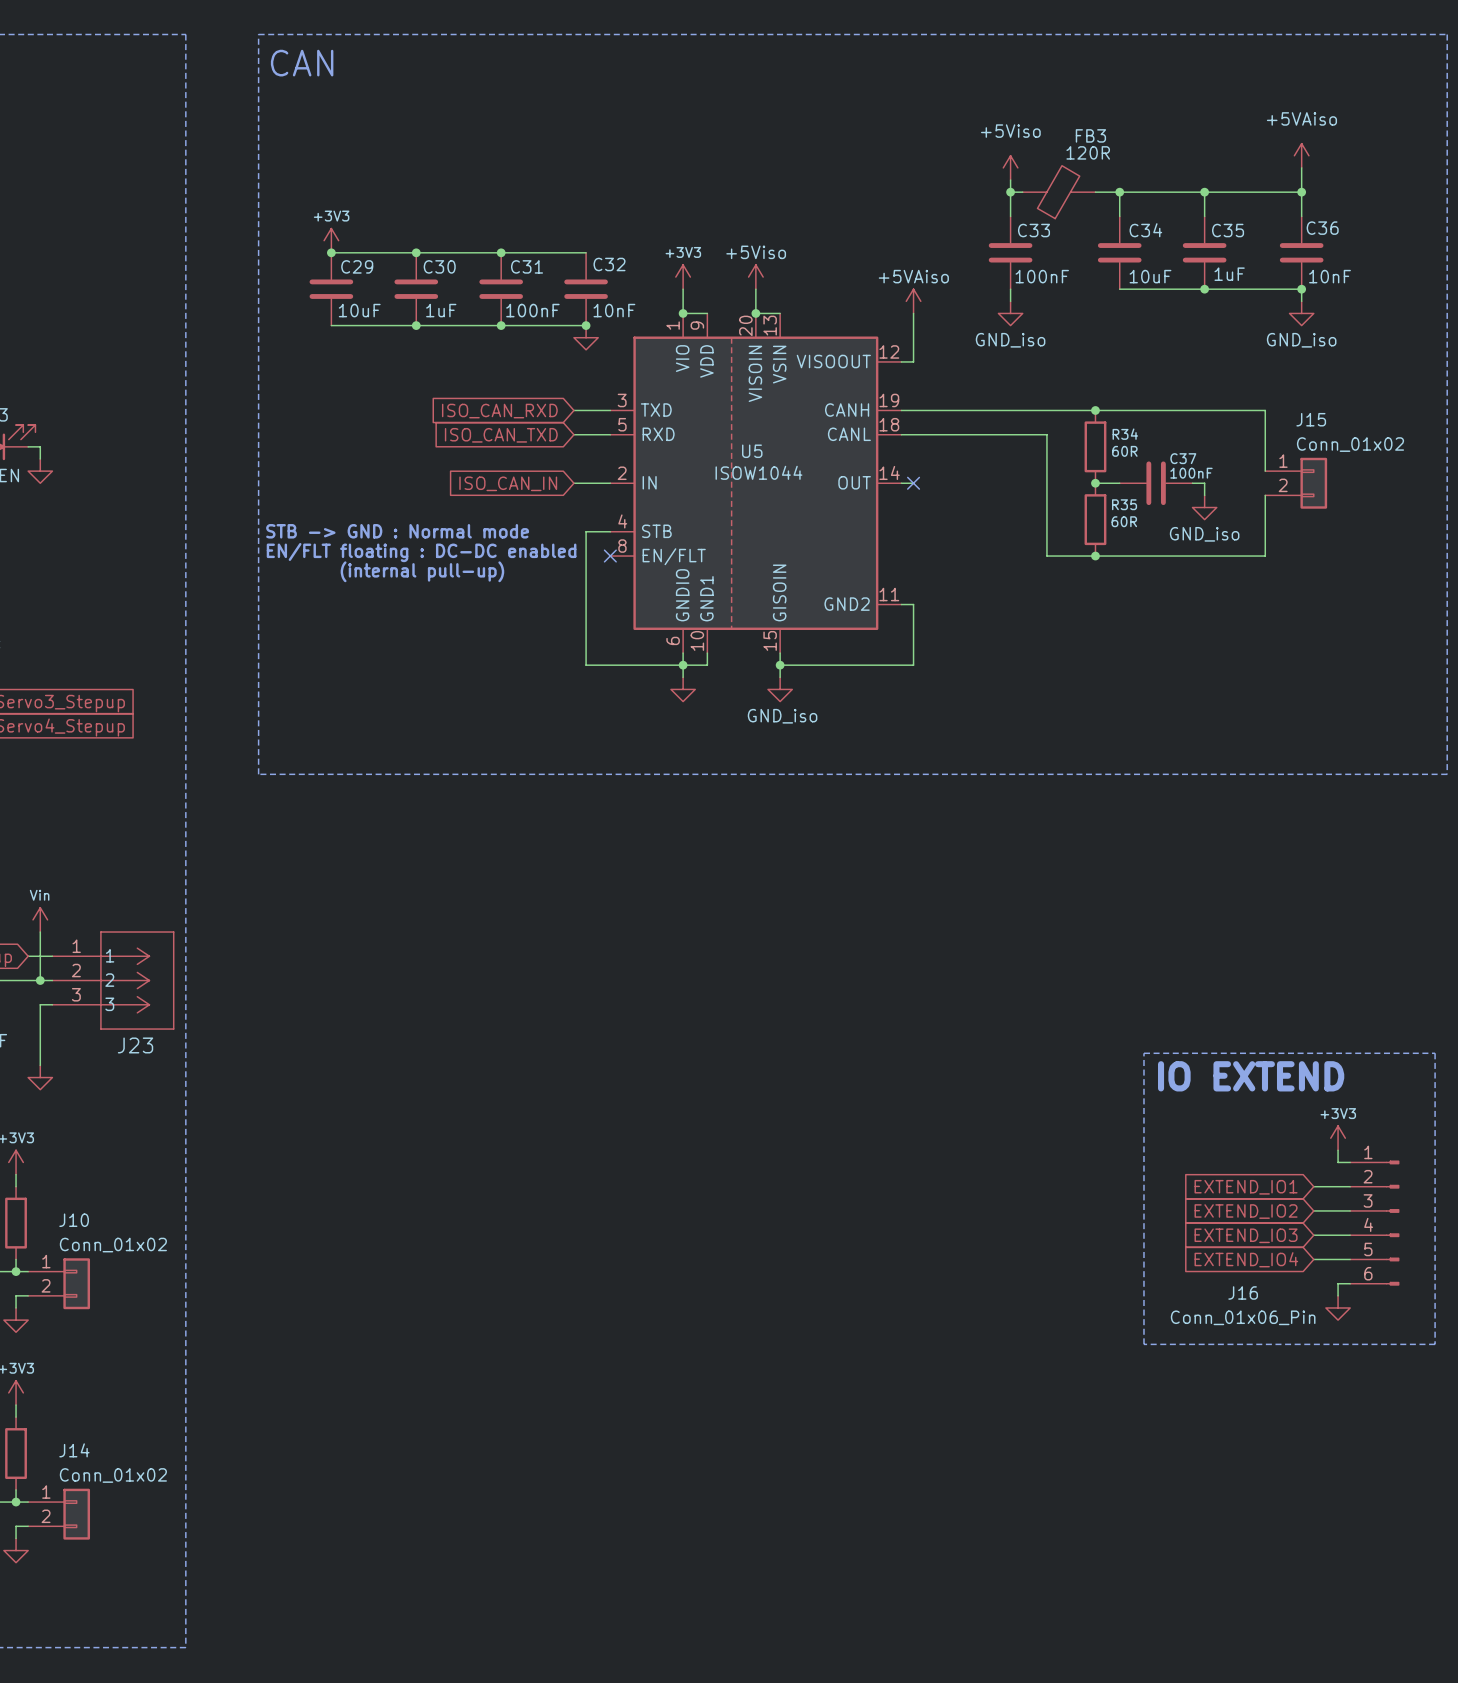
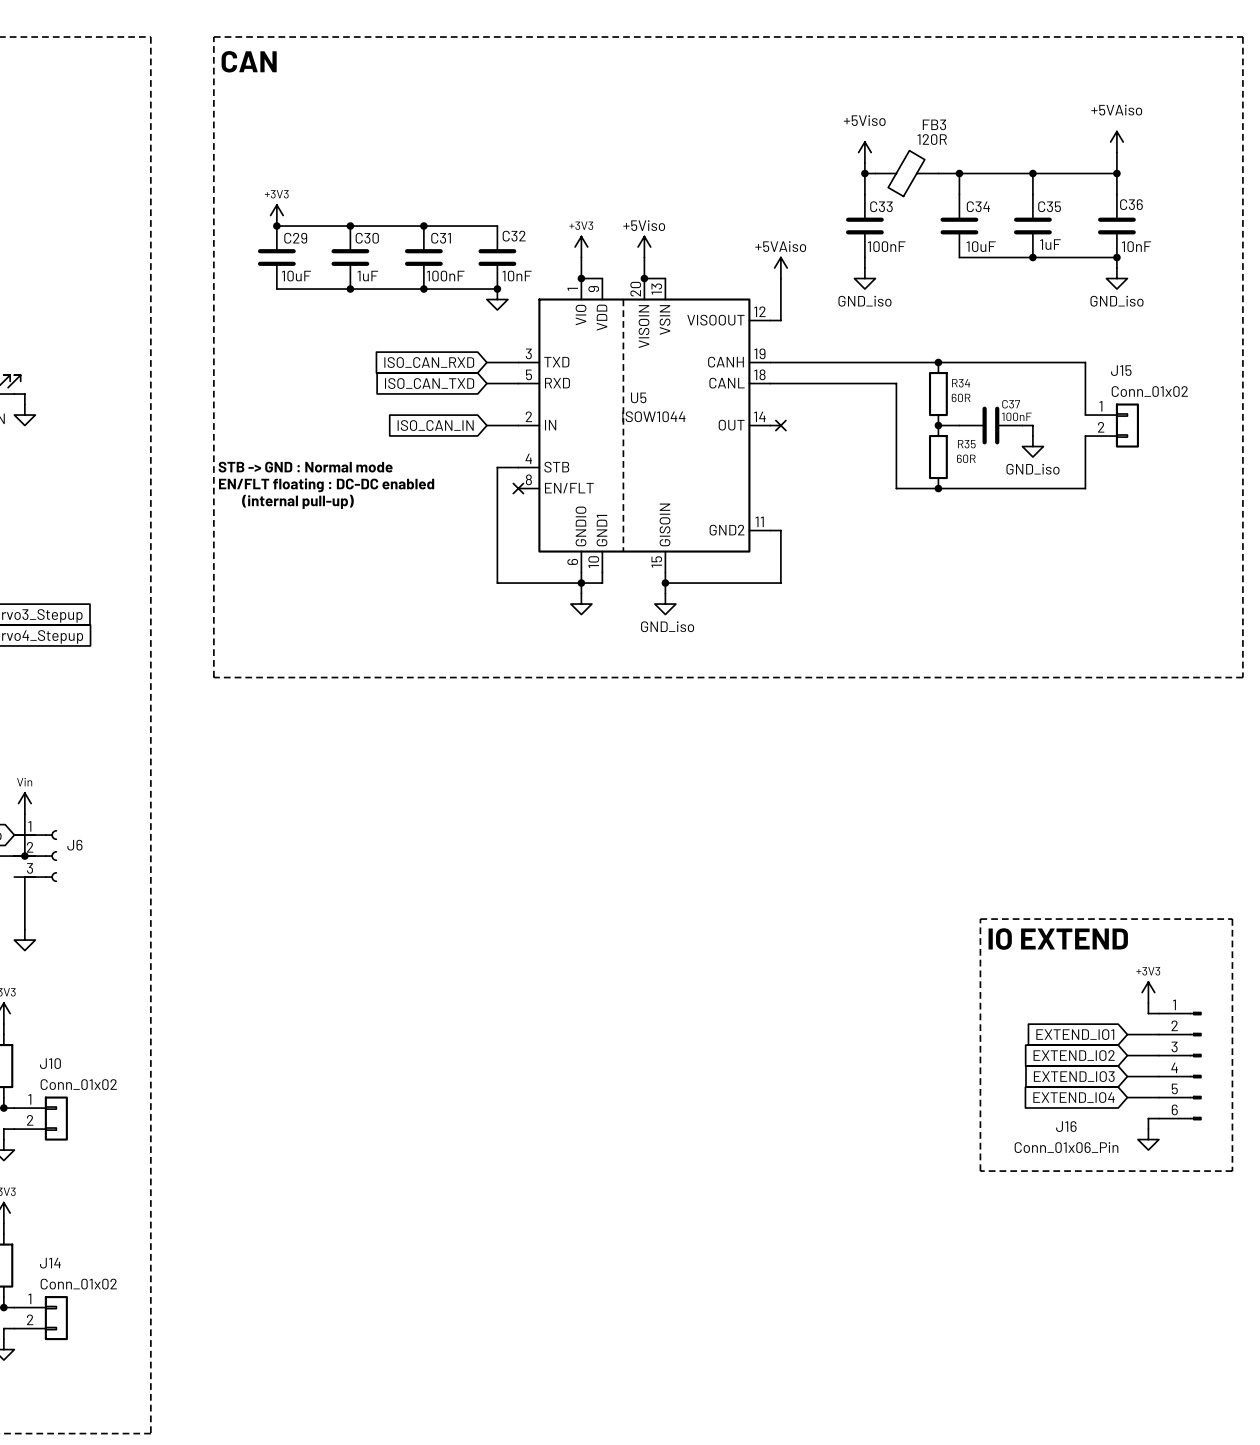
J6: none -> (35, 856)
J23: (113, 980) -> none

